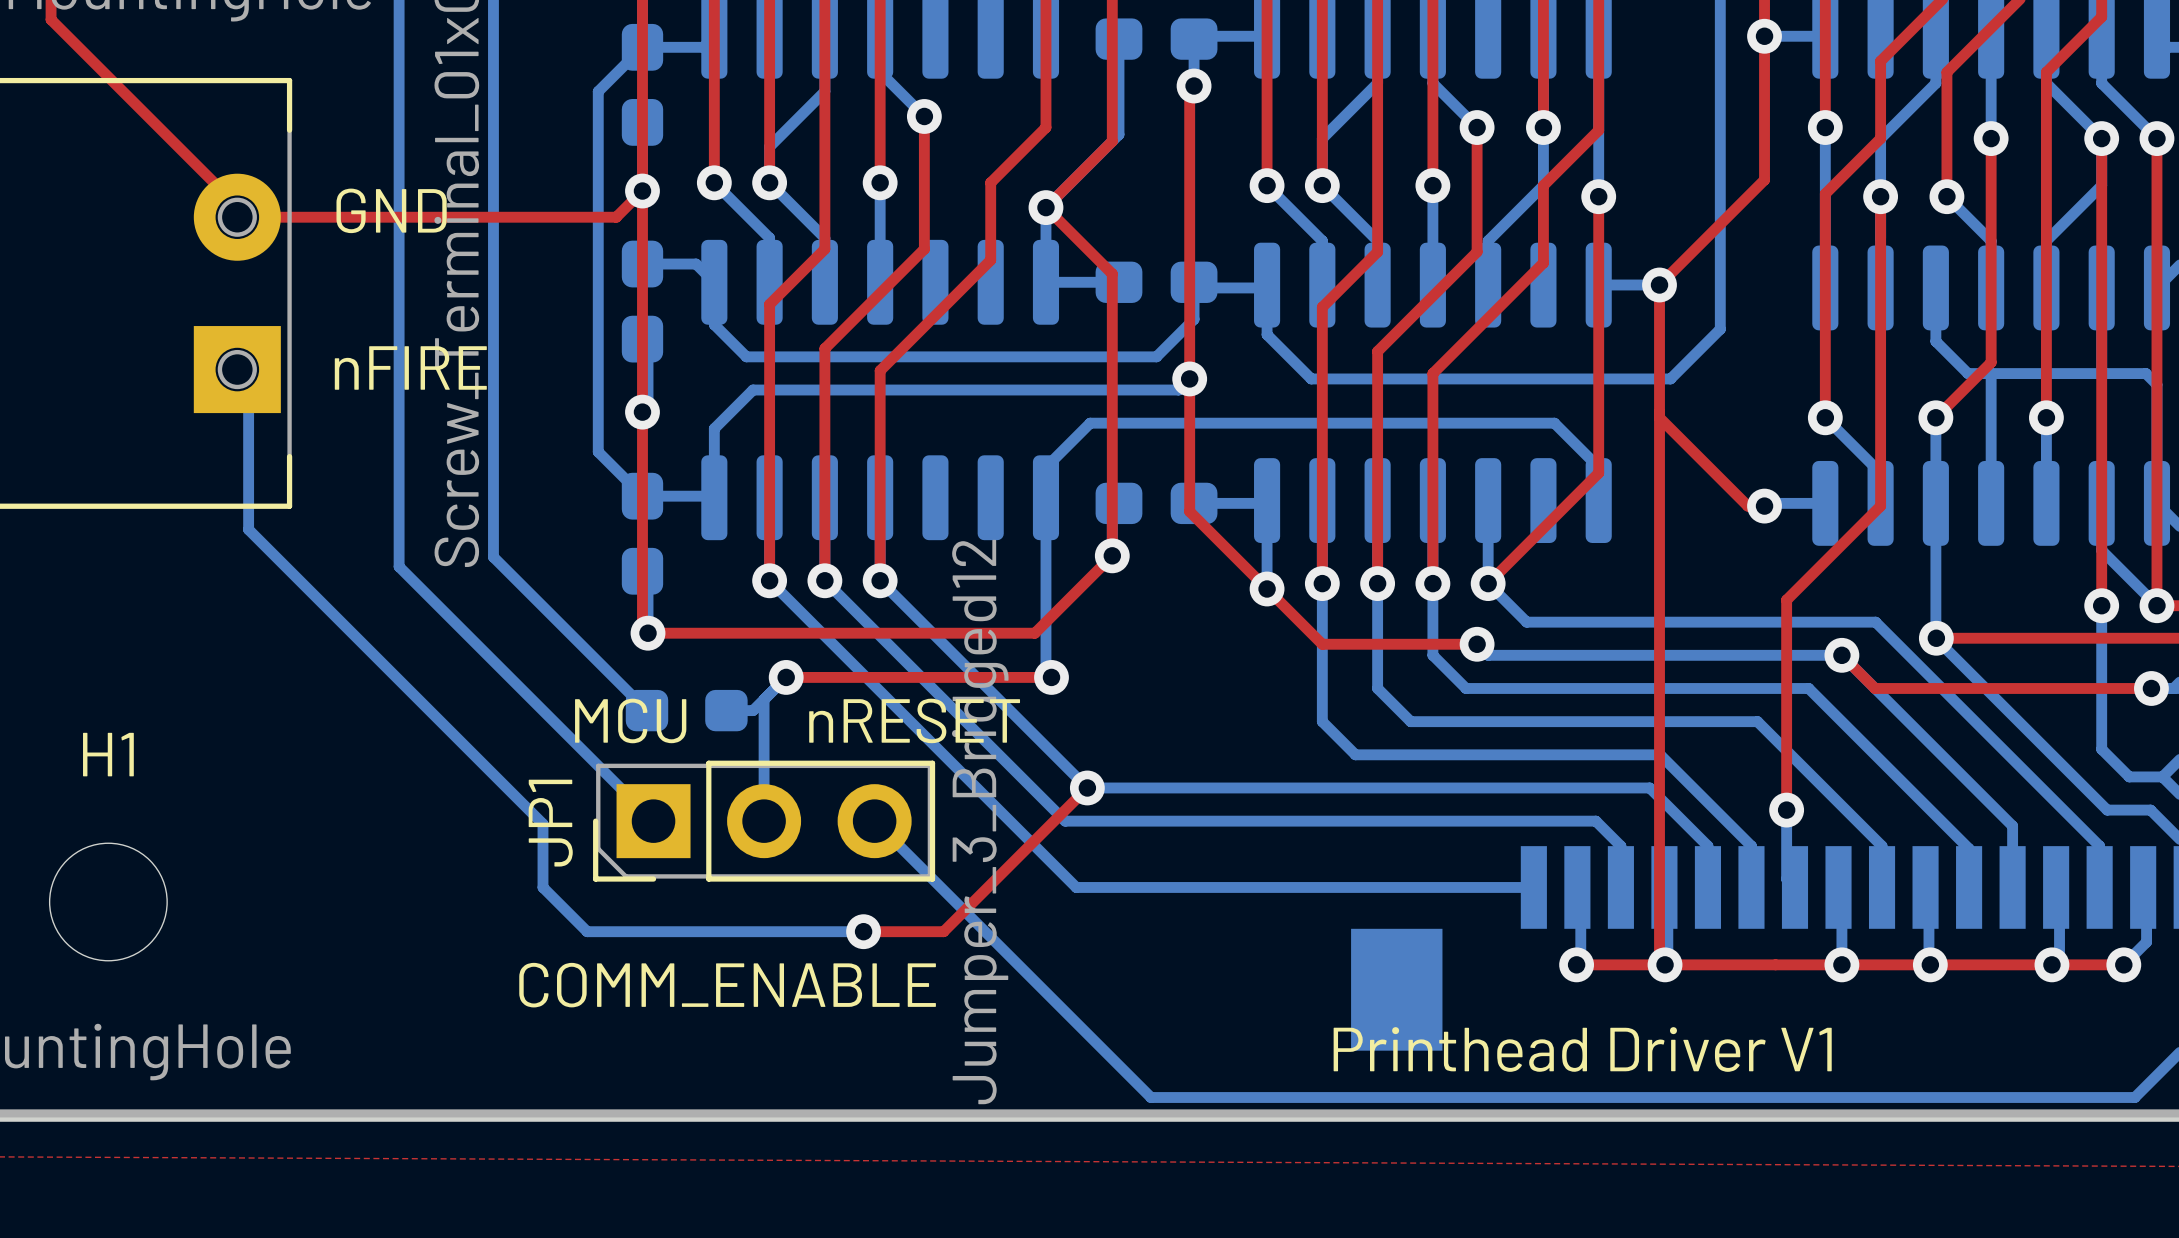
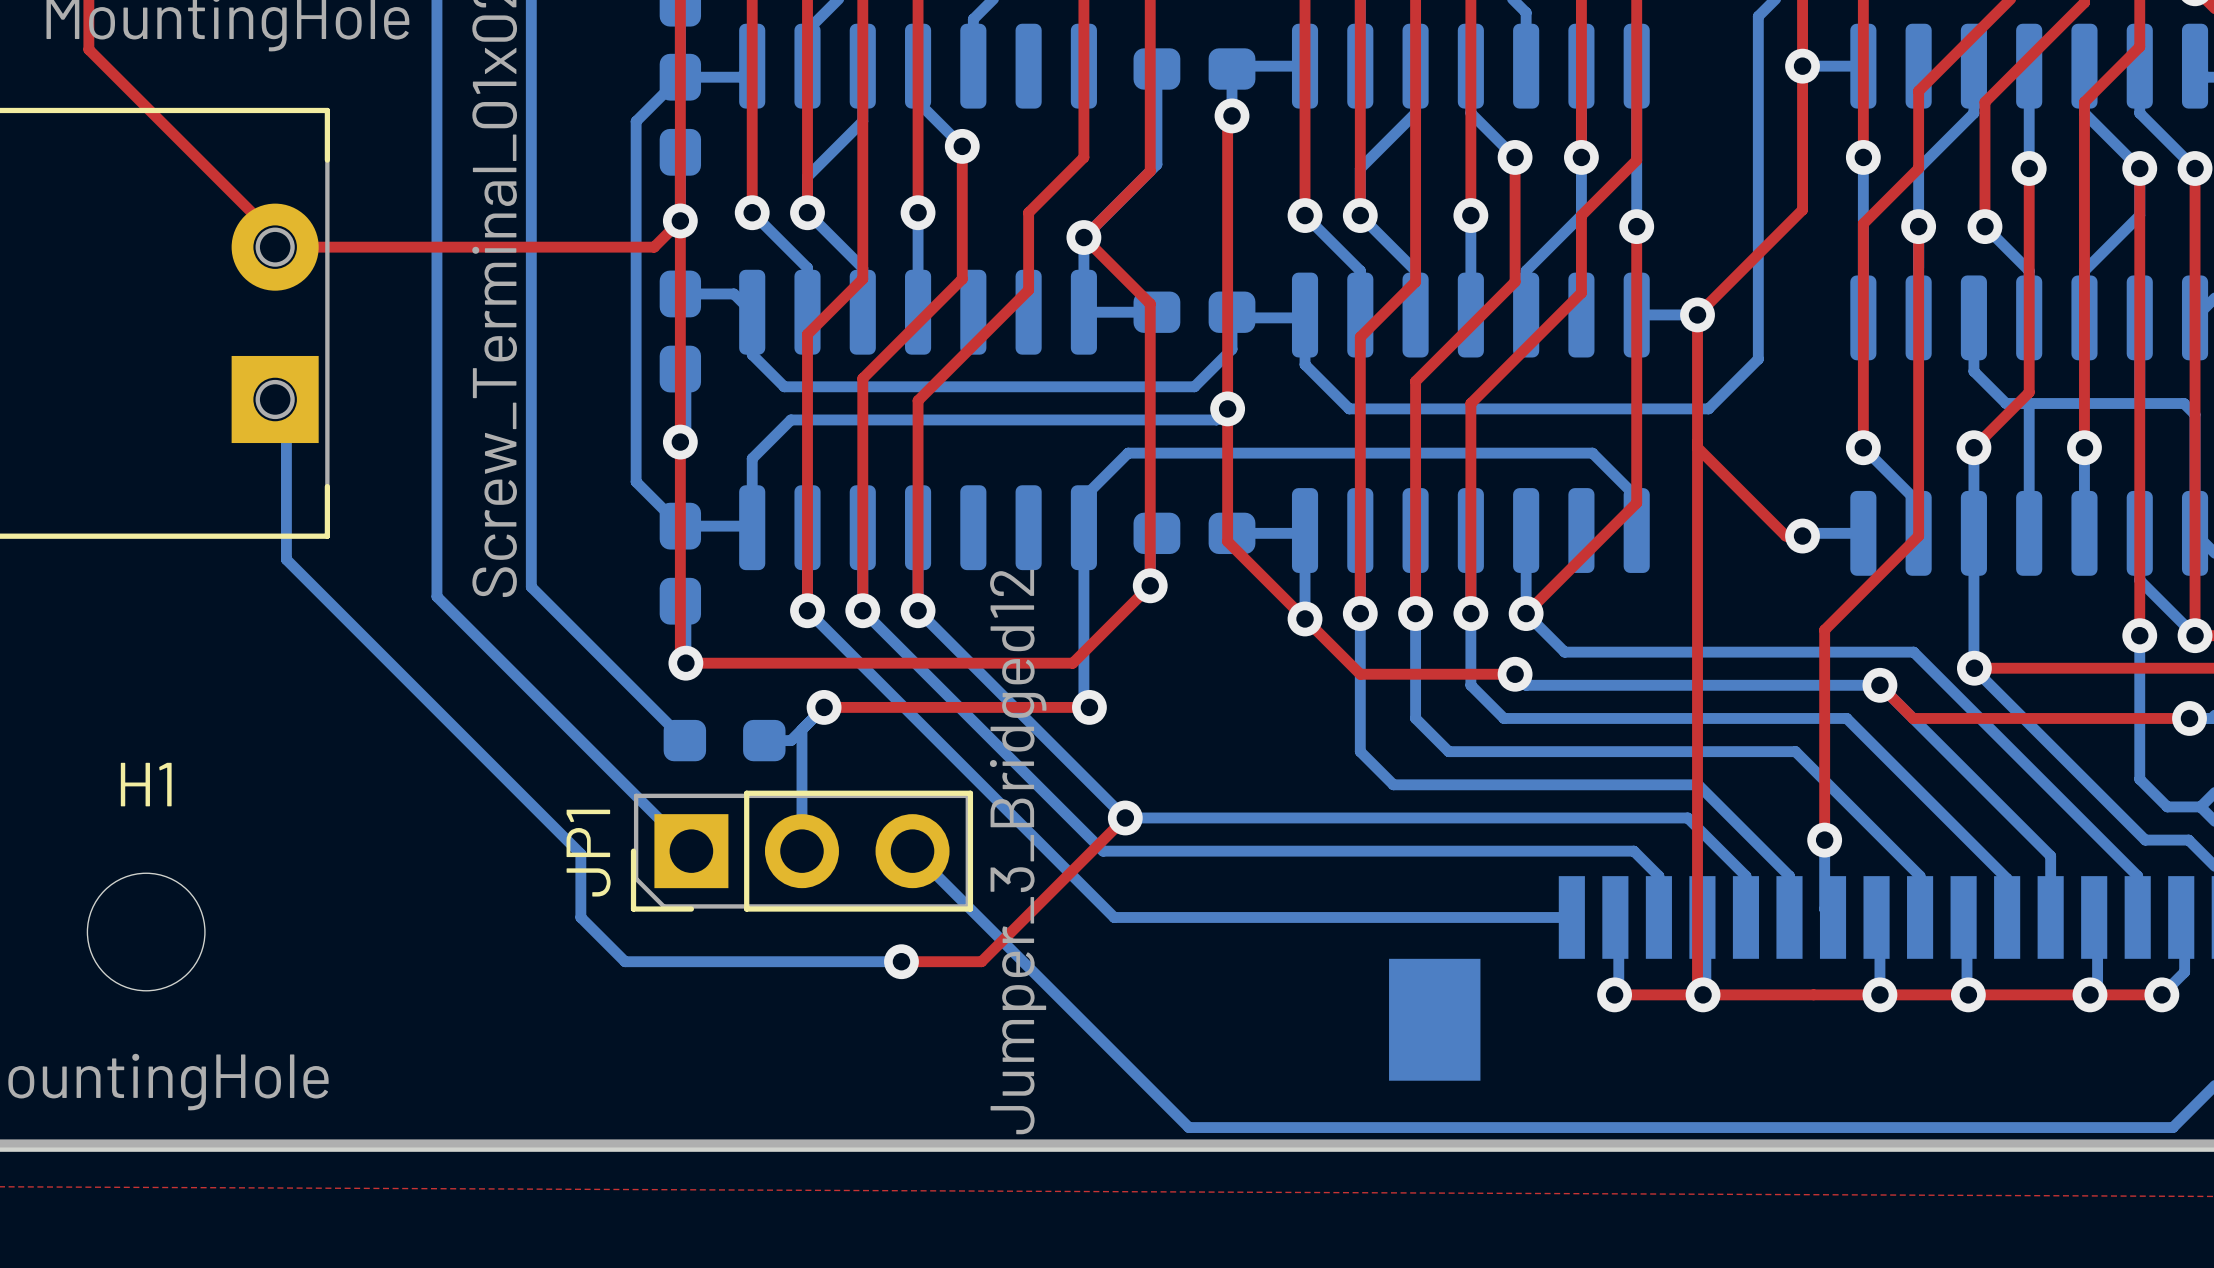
text: GND (391, 210) -> none
text: nFIRE (410, 367) -> none
text: MCU (630, 720) -> none
text: nRESET (914, 720) -> none
text: COMM_ENABLE (727, 985) -> none
text: Printhead Driver V1 (1582, 1049) -> none

